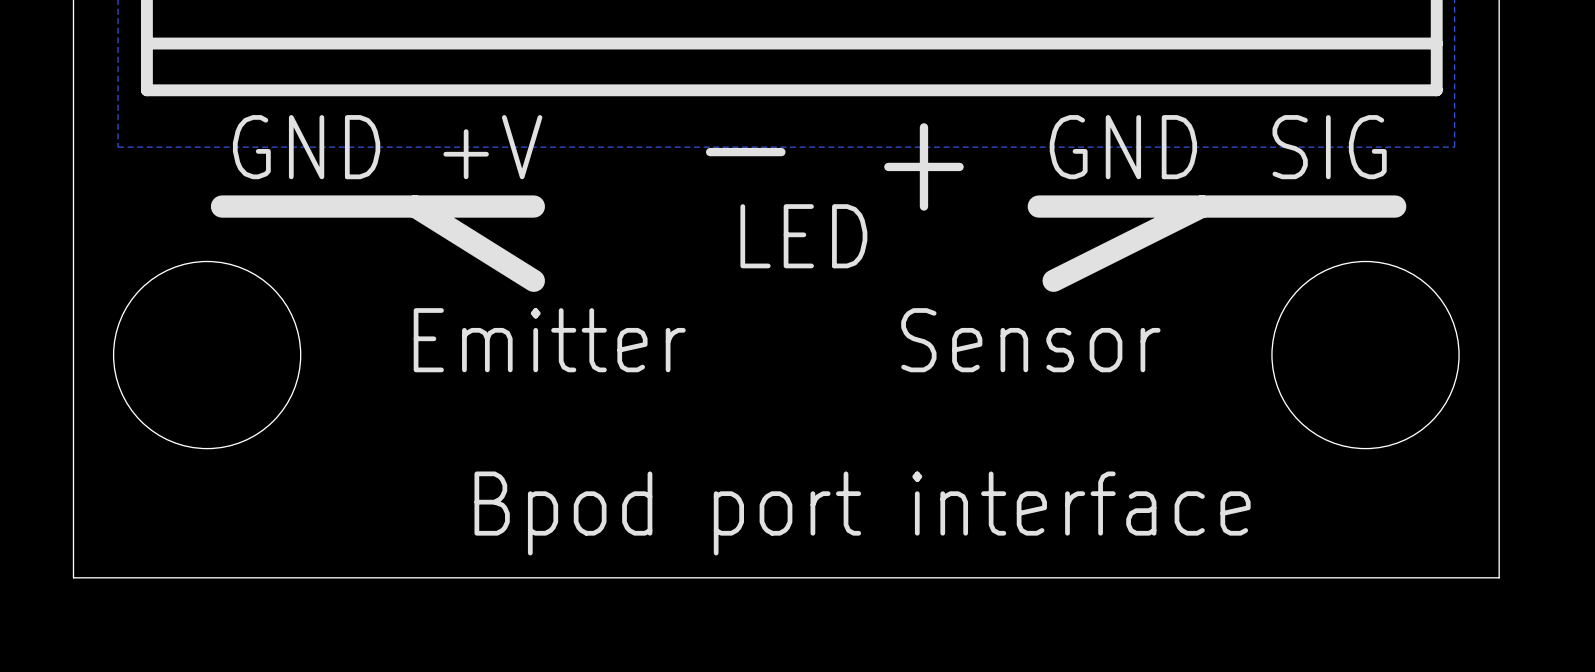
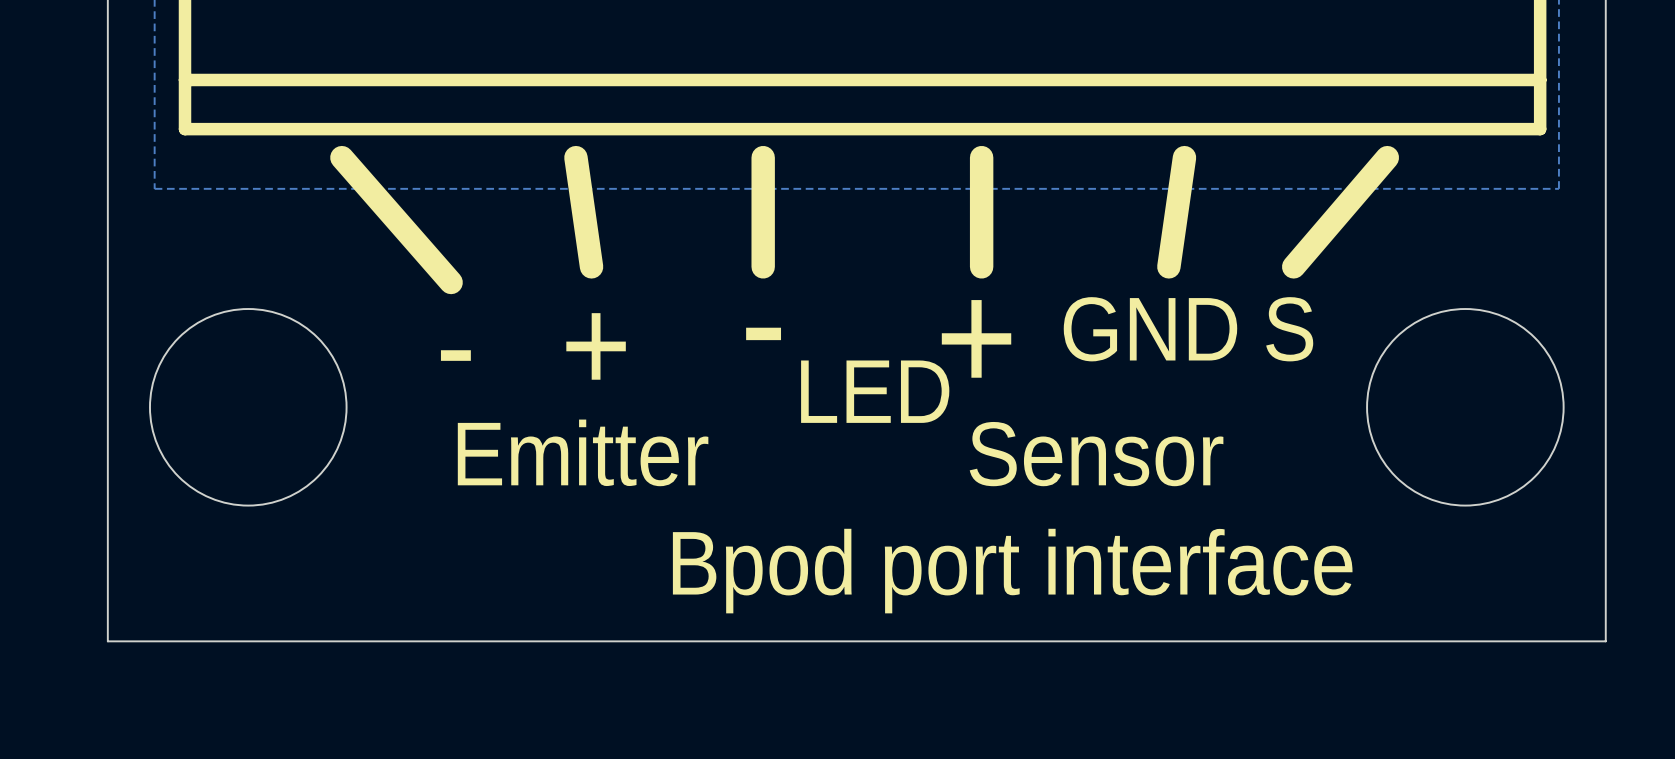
line: none -> (341, 157) (451, 282)
line: none -> (575, 157) (591, 266)
line: none -> (763, 157) (763, 266)
line: none -> (981, 157) (981, 266)
line: none -> (1184, 157) (1168, 266)
line: none -> (1387, 157) (1293, 266)
text: GND (306, 147) -> none
text: +V (492, 147) -> + (596, 346)
text position: GND (1123, 147) -> GND (1150, 329)
text: SIG (1329, 147) -> none
text position: - (745, 152) -> - (763, 333)
text position: + (923, 166) -> + (976, 338)
line: (221, 206) (533, 206) -> none
line: (415, 206) (533, 280) -> none
line: (1038, 206) (1395, 206) -> none
line: (1202, 206) (1053, 280) -> none
text position: LED (803, 236) -> LED (875, 391)
text: none -> S (1289, 329)
text: none -> - (455, 355)
text position: Emitter (549, 340) -> Emitter (583, 452)
text position: Sensor (1030, 340) -> Sensor (1096, 454)

